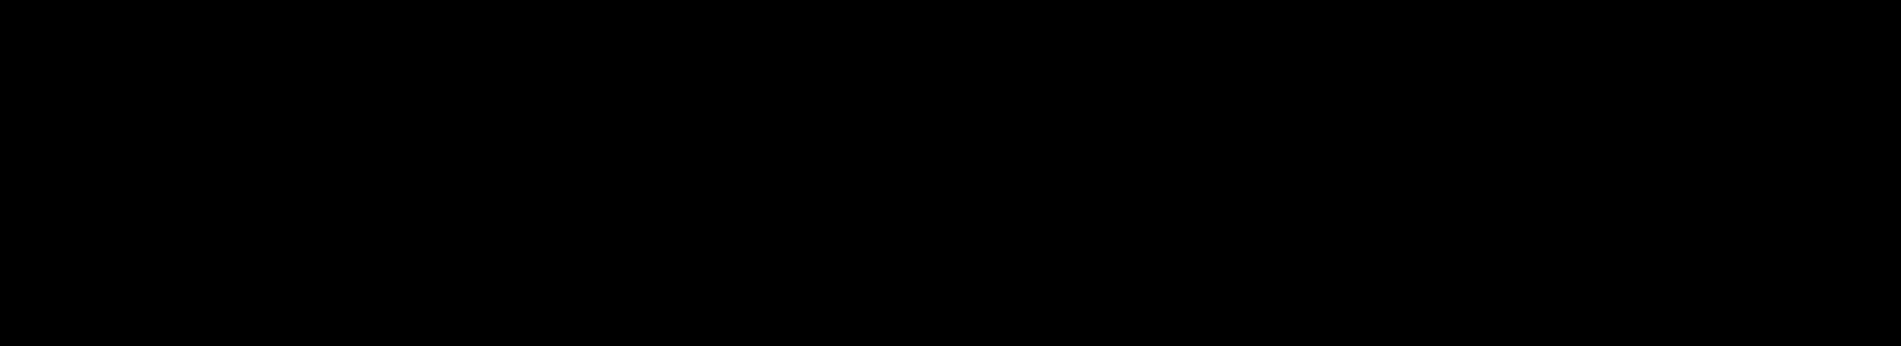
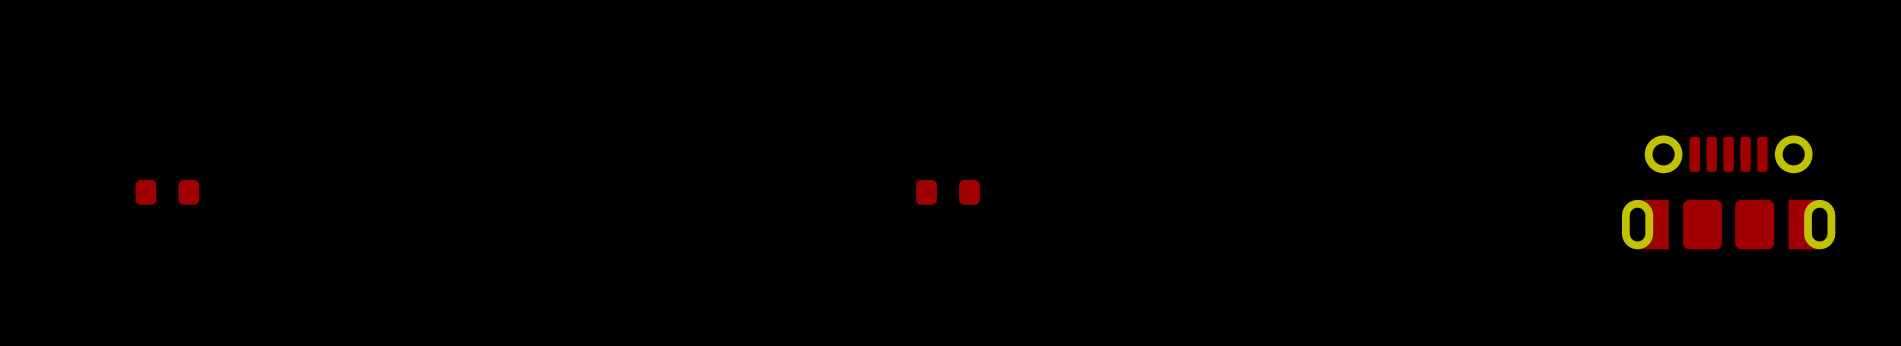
part: none -> (167, 192)
part: none -> (947, 192)
part: none -> (1728, 192)

